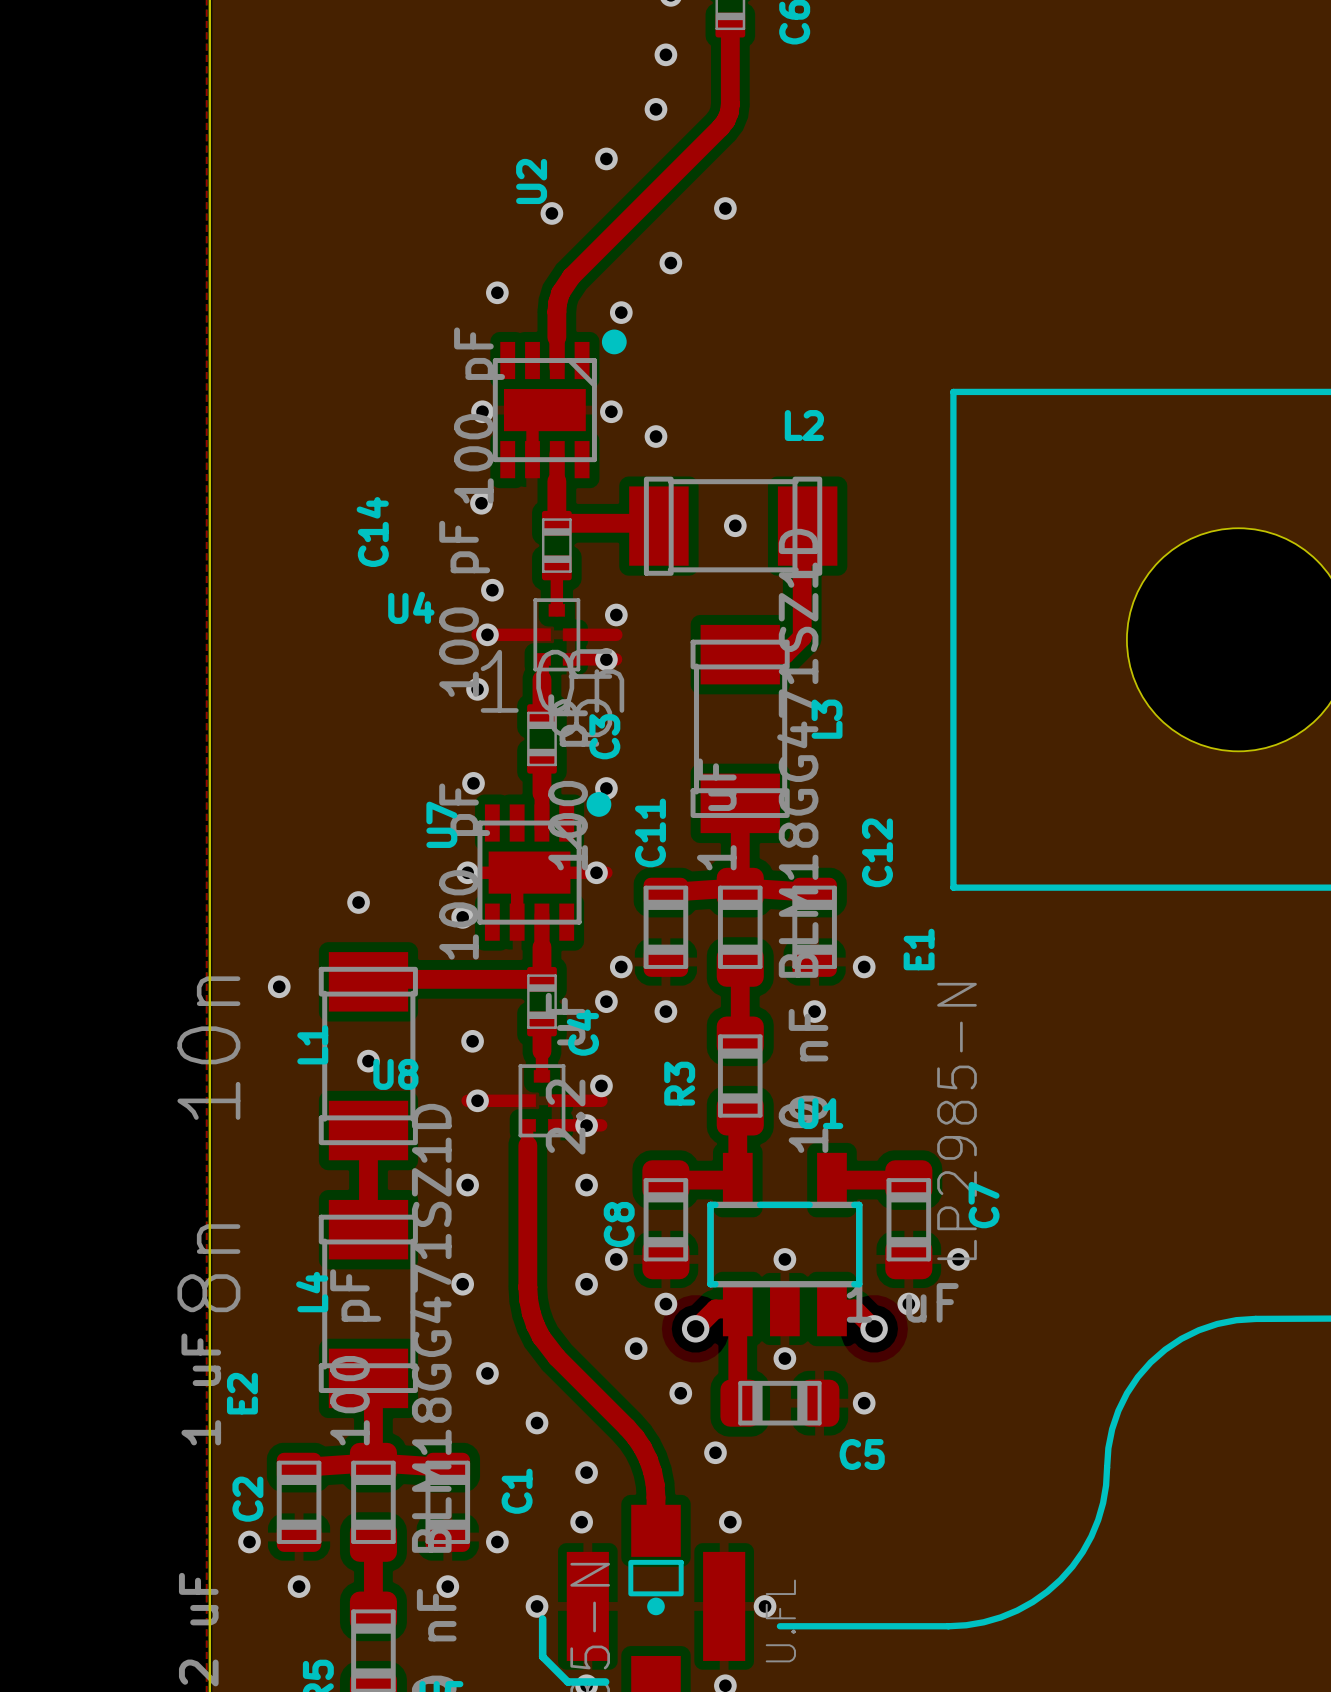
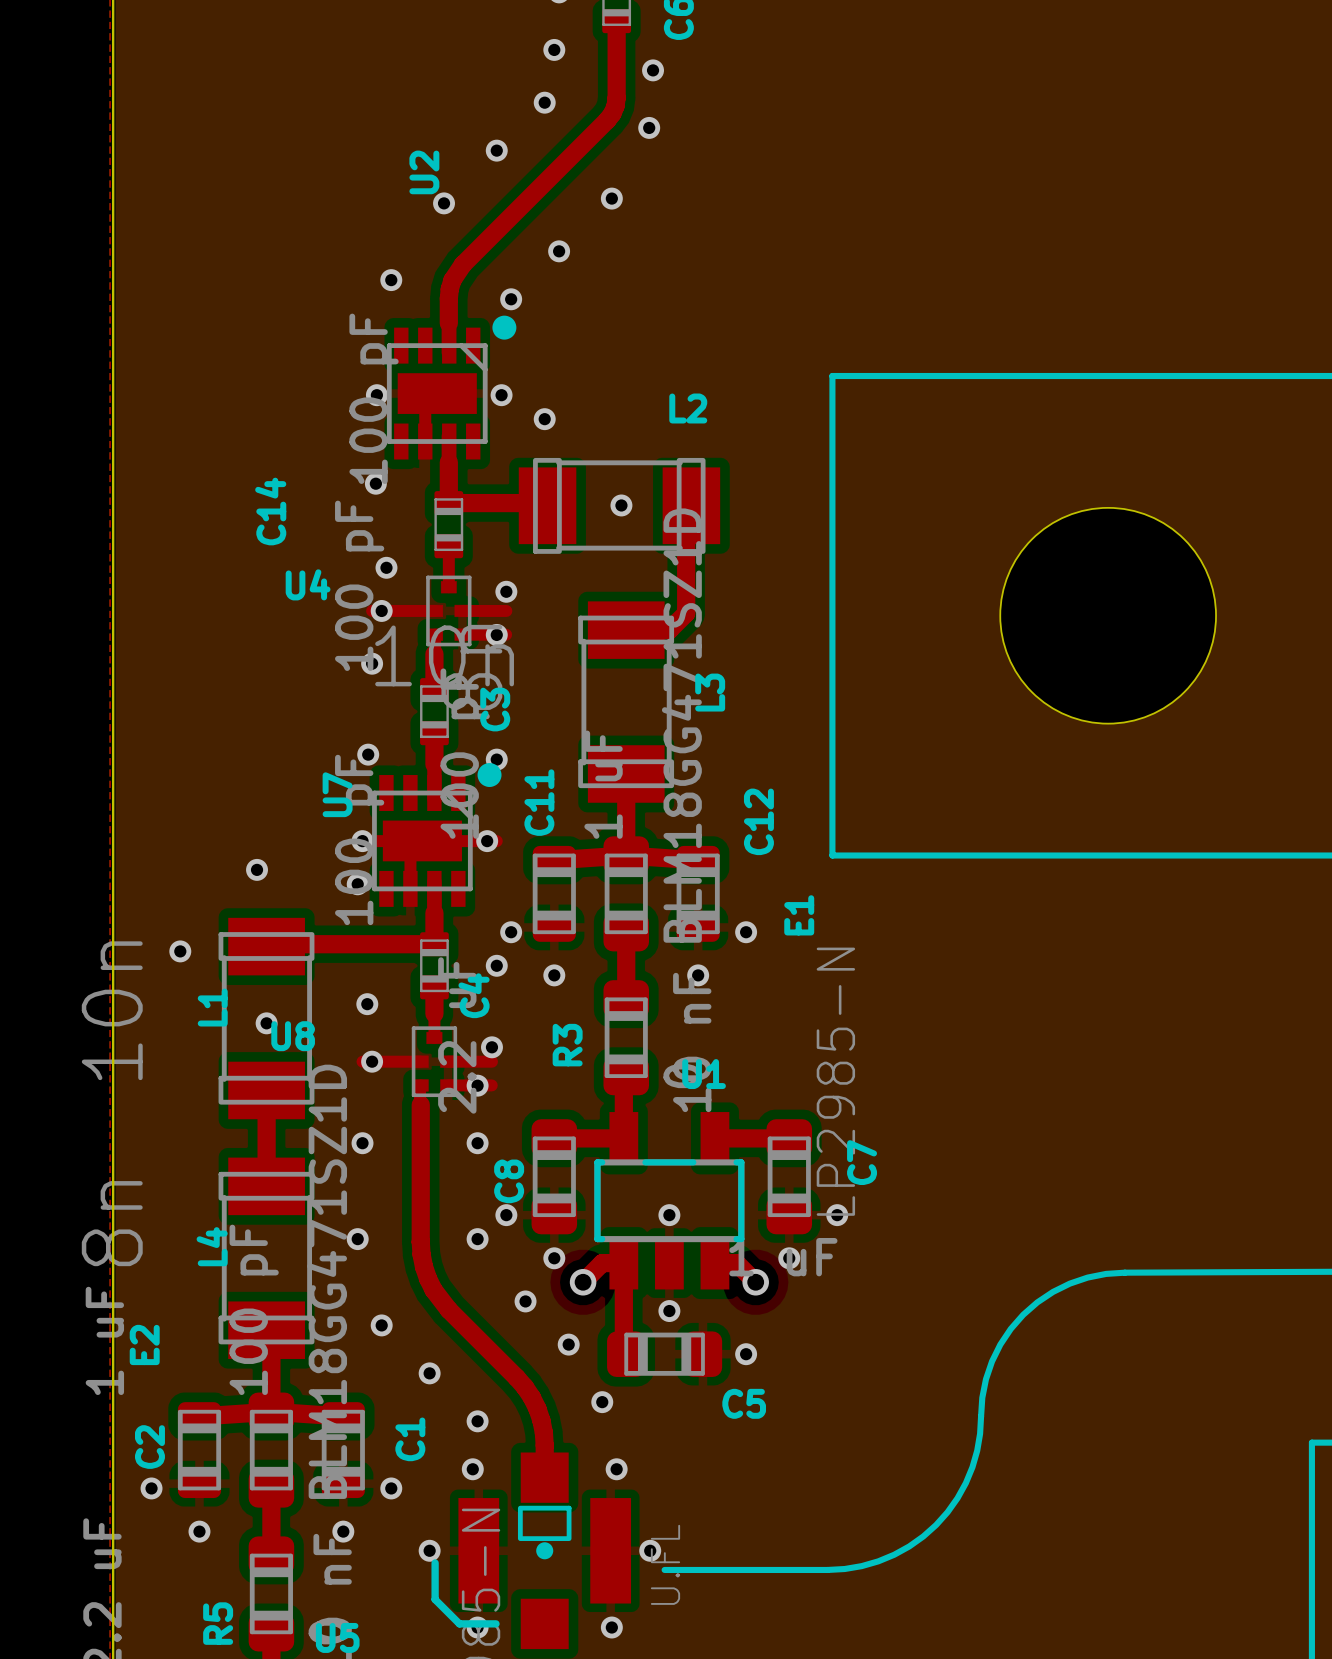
via: none -> (653, 70)
via: none -> (649, 127)

